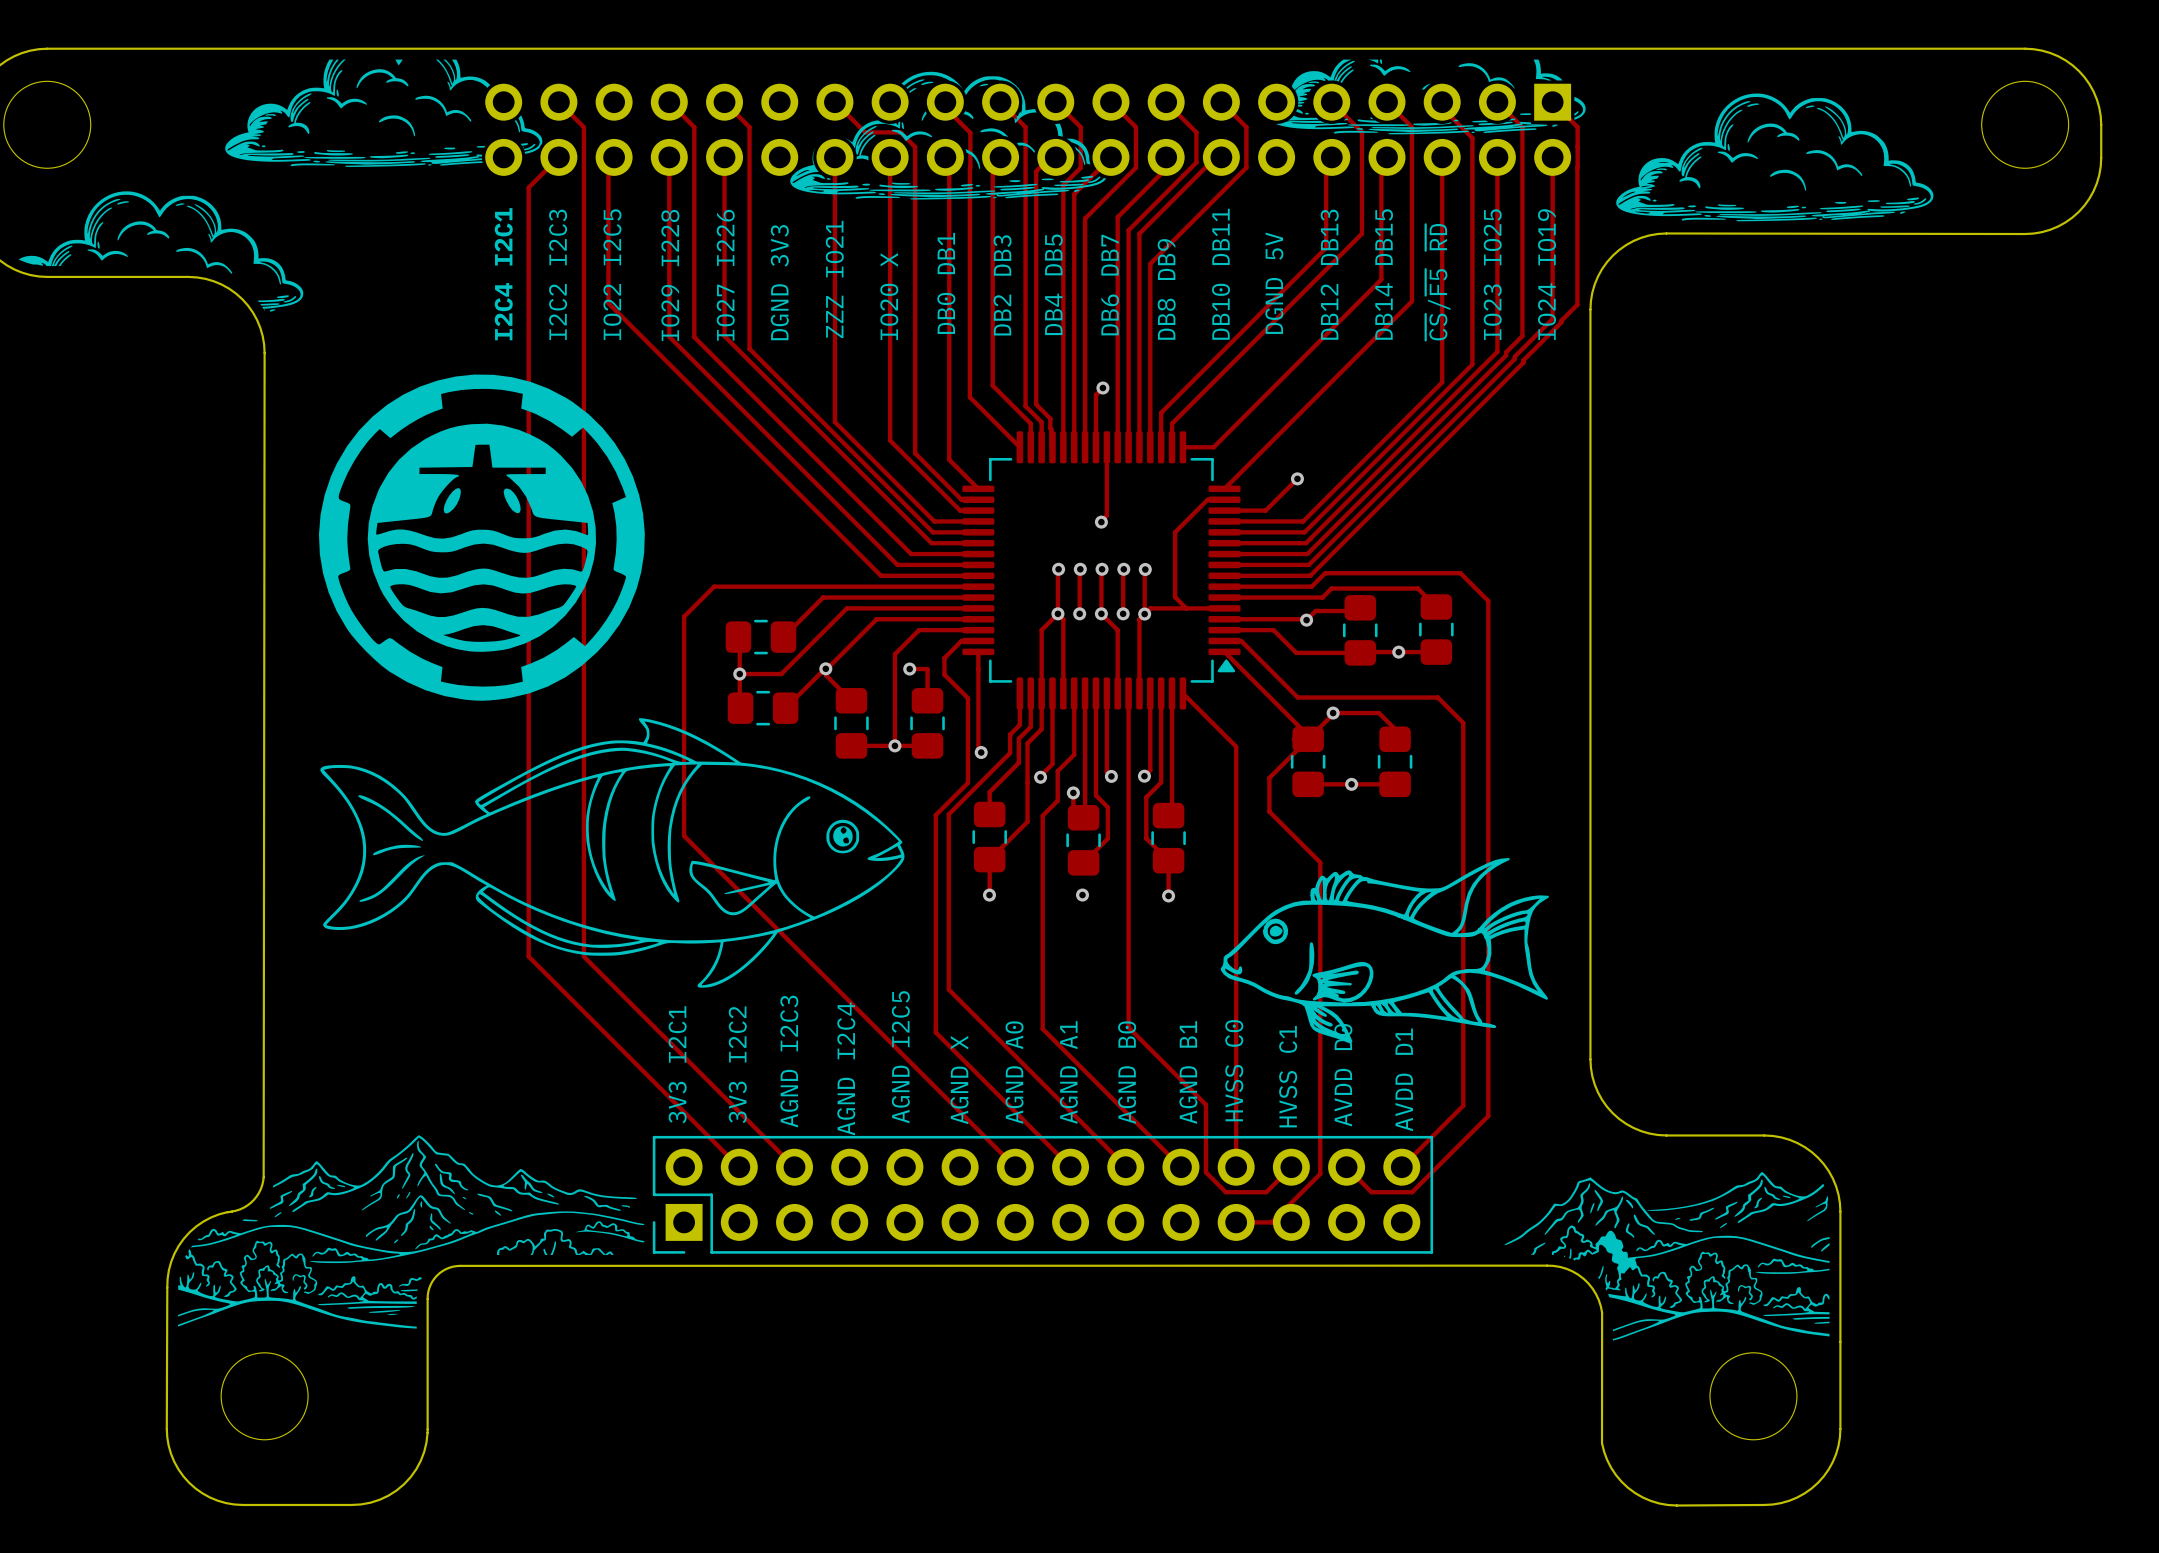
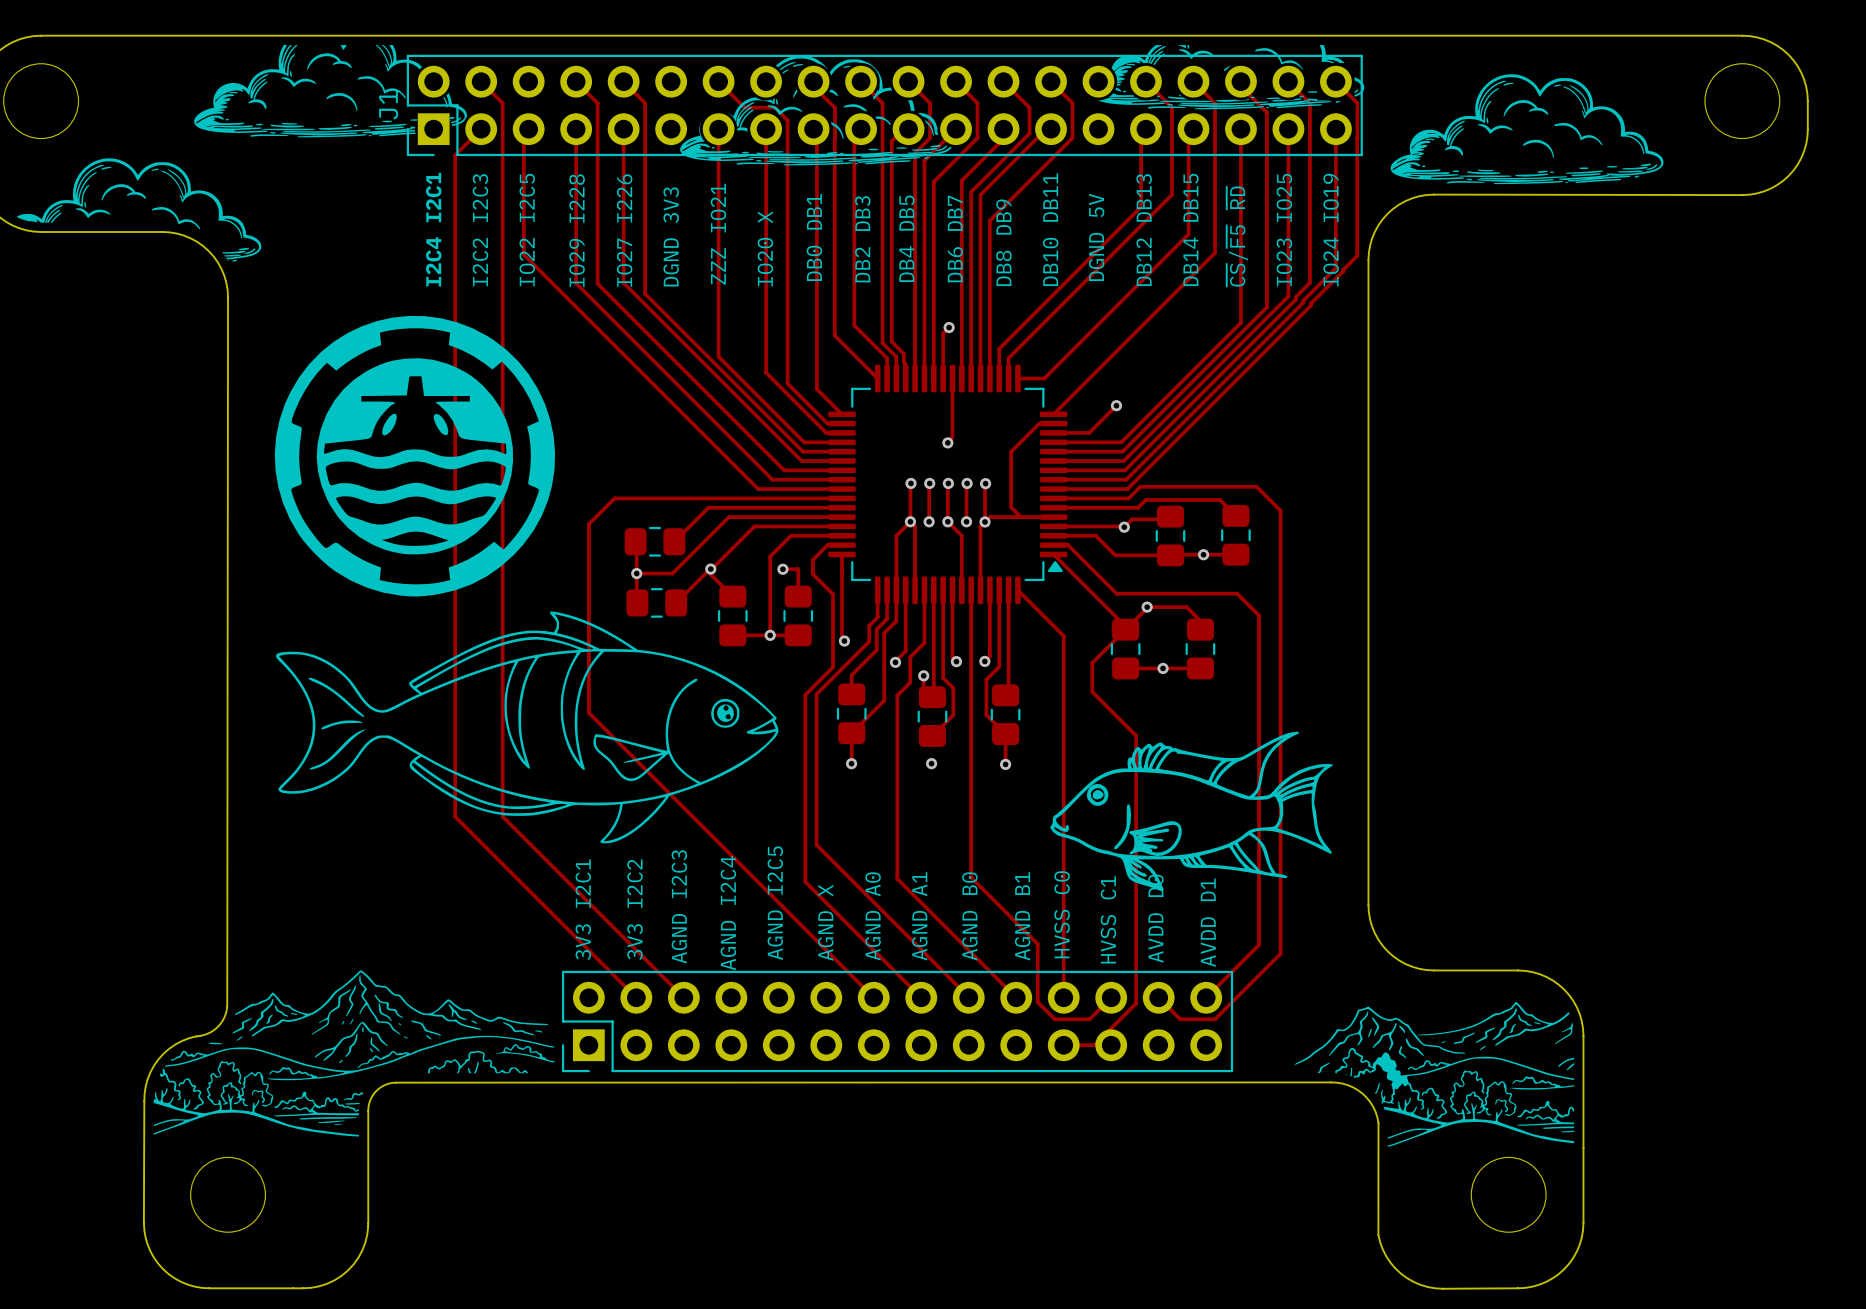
part: (1028, 129) -> none
J1: none -> (884, 105)

